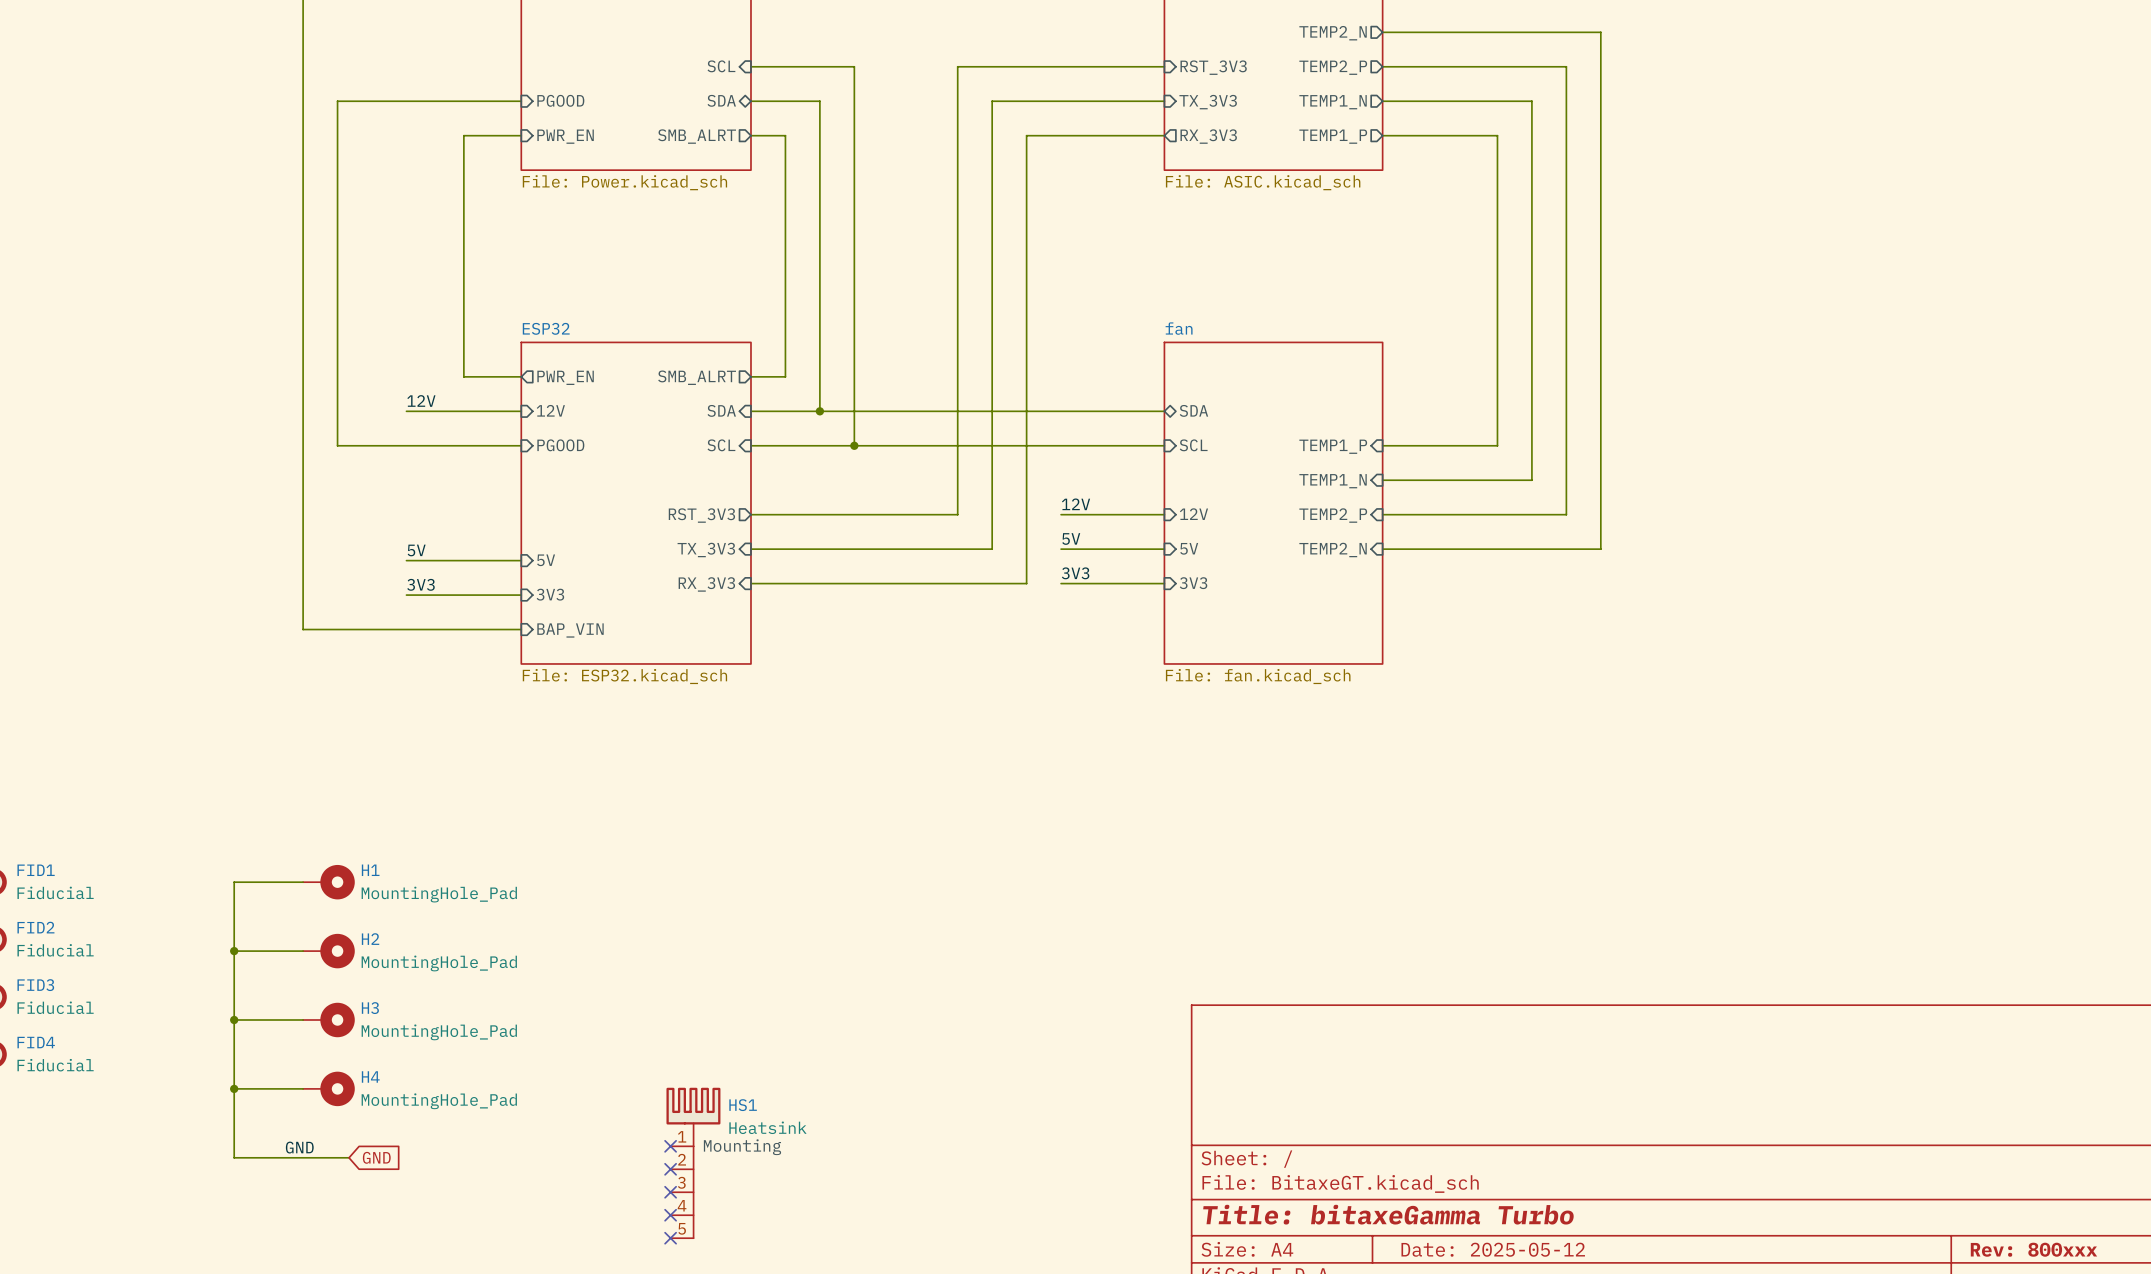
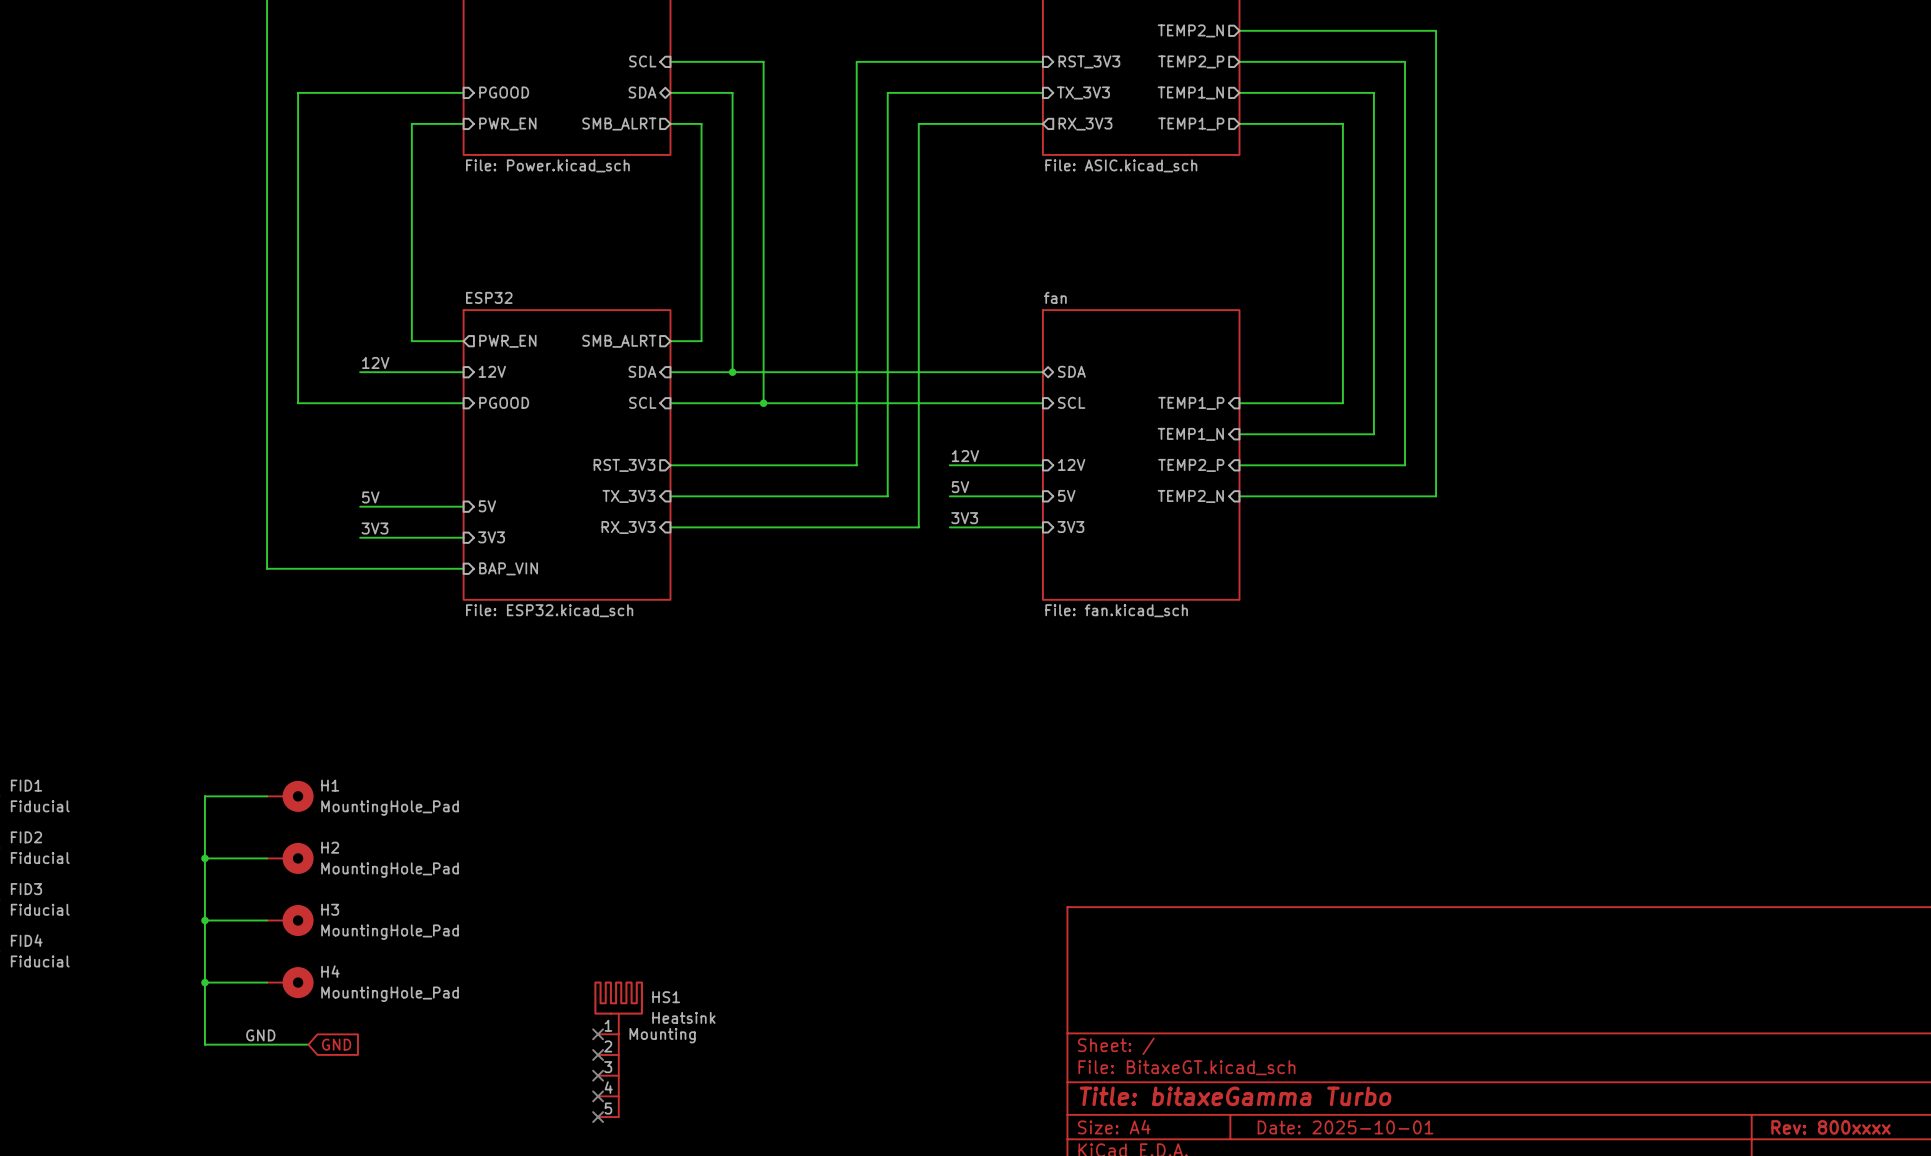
title block: Date: 2025-05-12 (1493, 1249) -> Date: 2025-10-01 (1345, 1127)
title block: Rev: 800xxx (2033, 1249) -> Rev: 800xxxx (1830, 1127)

